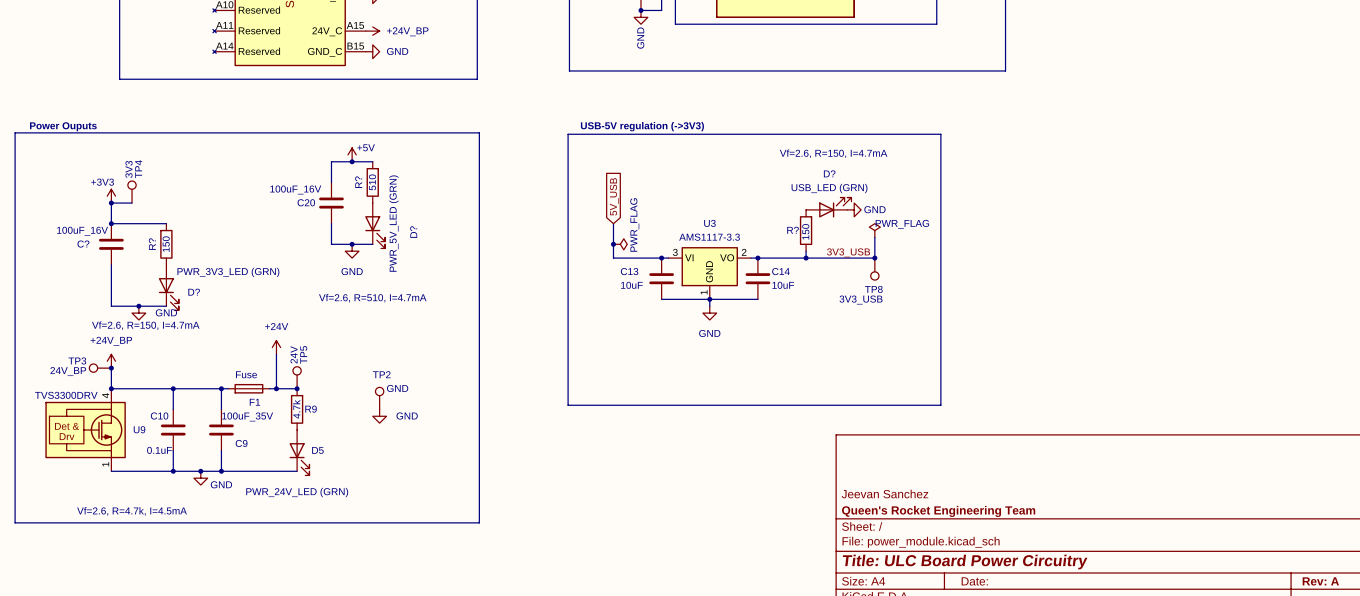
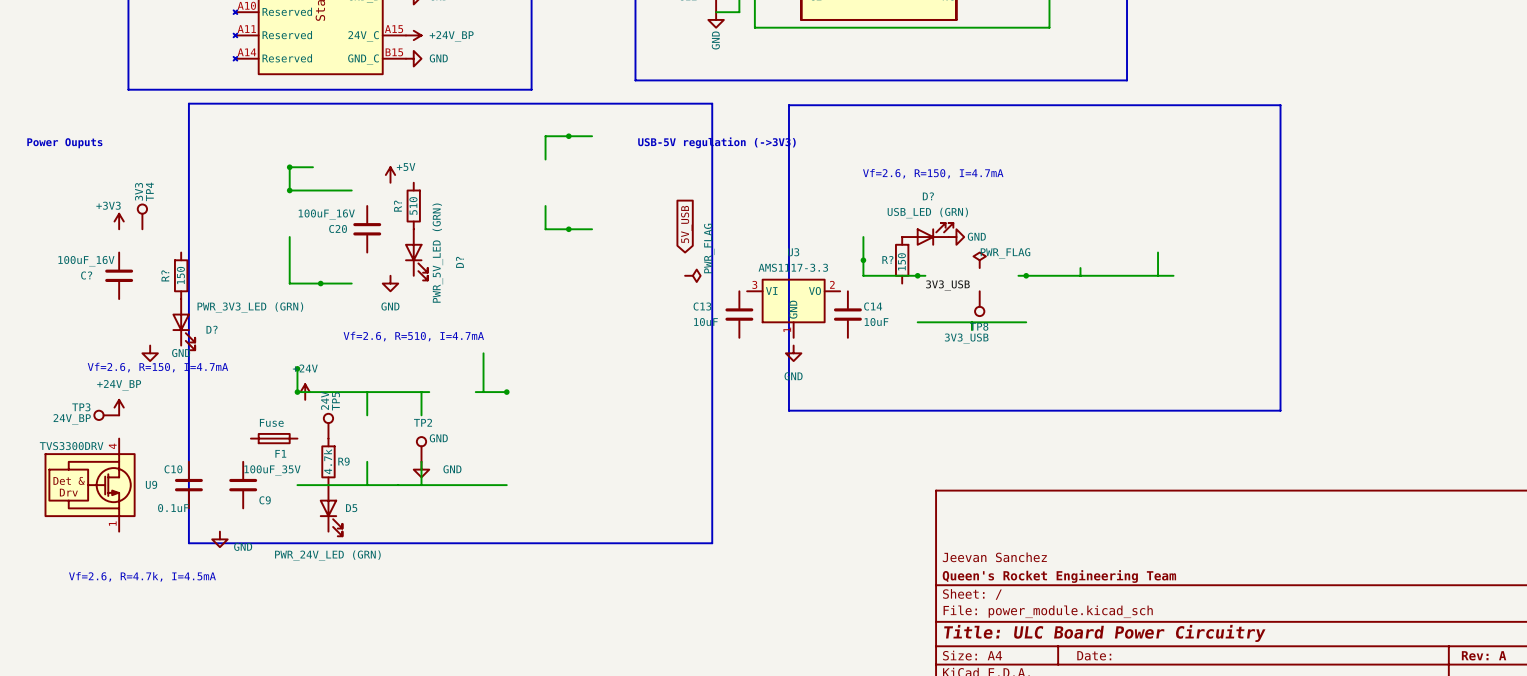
junction: (640, 10) -> none
line: none -> (188, 103) (712, 103) (712, 543) (188, 543) (188, 103)
line: none -> (788, 105) (1280, 105) (1280, 410) (788, 410) (788, 105)
junction: none -> (568, 136)
wire: none -> (592, 136) (545, 136) (545, 159)
line: (15, 132) (479, 132) (479, 522) (15, 522) (15, 132) -> none
line: (568, 134) (940, 134) (940, 405) (568, 405) (568, 134) -> none
junction: none -> (289, 167)
wire: none -> (312, 167) (289, 167) (289, 190) (351, 190)
junction: (352, 161) -> none
wire: (372, 161) (331, 161) (331, 182) -> none
junction: none -> (289, 190)
wire: none -> (545, 206) (545, 229) (592, 229)
junction: (111, 203) -> none
wire: (132, 203) (111, 203) (111, 223) (166, 223) -> none
junction: none -> (568, 229)
wire: none -> (289, 237) (289, 283) (351, 283)
wire: none -> (863, 237) (863, 275) (925, 275)
junction: (111, 223) -> none
wire: (331, 223) (331, 244) (372, 244) -> none
wire: (613, 223) (613, 258) (668, 258) -> none
wire: none -> (1158, 252) (1158, 275)
junction: none -> (863, 260)
wire: (874, 237) (874, 258) (751, 258) -> none
wire: none -> (1080, 268) (1080, 275)
junction: (352, 244) -> none
junction: (613, 244) -> none
wire: none -> (1018, 275) (1173, 275)
junction: none -> (1026, 275)
junction: none -> (320, 283)
wire: (806, 251) (806, 258) -> (971, 322) (971, 330)
junction: (661, 258) -> none
junction: (757, 258) -> none
junction position: (806, 258) -> (917, 275)
junction: (874, 258) -> none
wire: (111, 264) (111, 306) (166, 306) -> none
wire: none -> (917, 322) (1026, 322)
wire: (661, 299) (757, 299) -> none
wire: (709, 299) (709, 306) -> none
junction: (709, 299) -> none
junction: (138, 306) -> none
wire: none -> (483, 353) (483, 392)
wire: none -> (297, 368) (297, 392) (429, 392)
junction: none -> (297, 368)
junction: none -> (297, 392)
wire: none -> (421, 392) (421, 415)
wire: none -> (475, 392) (506, 392)
junction: none -> (506, 392)
wire: (276, 354) (276, 388) -> none
wire: (111, 368) (111, 388) (228, 388) -> none
junction: (111, 368) -> none
junction: (111, 388) -> none
junction: (173, 388) -> none
wire: (221, 388) (221, 409) -> (367, 392) (367, 415)
junction: (221, 388) -> none
wire: (269, 388) (297, 388) -> none
junction: (276, 388) -> none
junction: (297, 388) -> none
wire: none -> (421, 461) (421, 485)
wire: none -> (297, 485) (506, 485)
wire: (221, 450) (221, 471) -> (367, 461) (367, 485)
wire: (111, 471) (297, 471) -> none
junction: (173, 471) -> none
junction: (200, 471) -> none
junction: (221, 471) -> none

